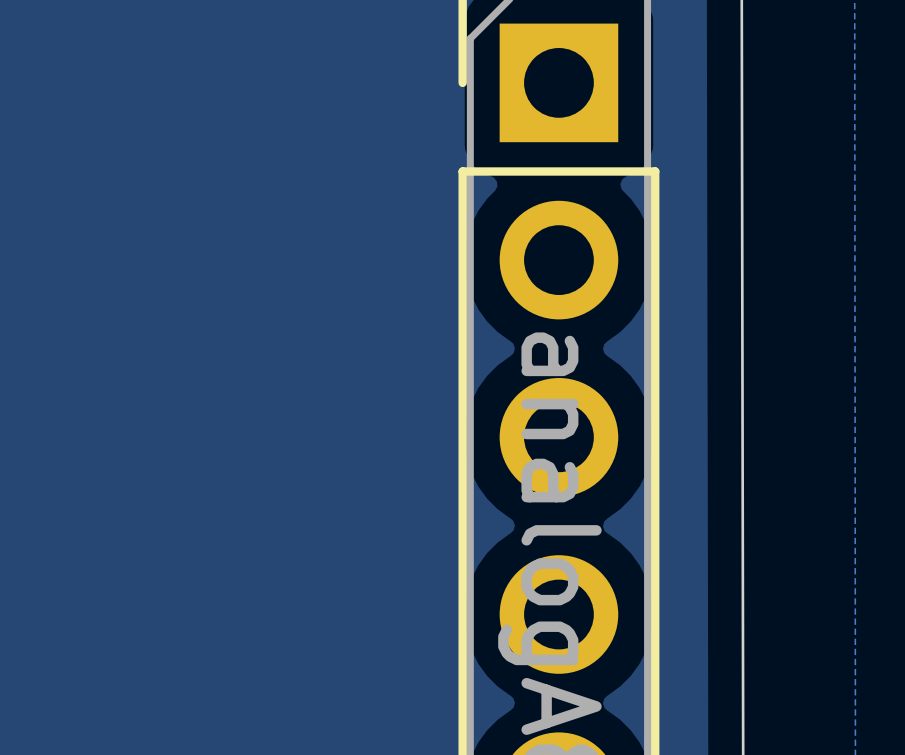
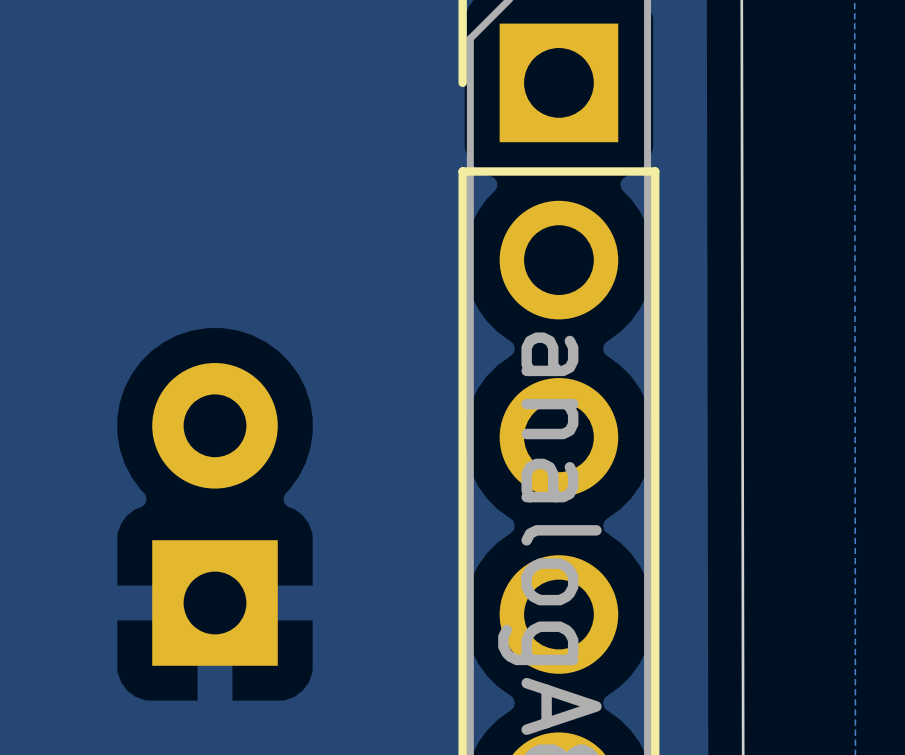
part: none -> (215, 514)

